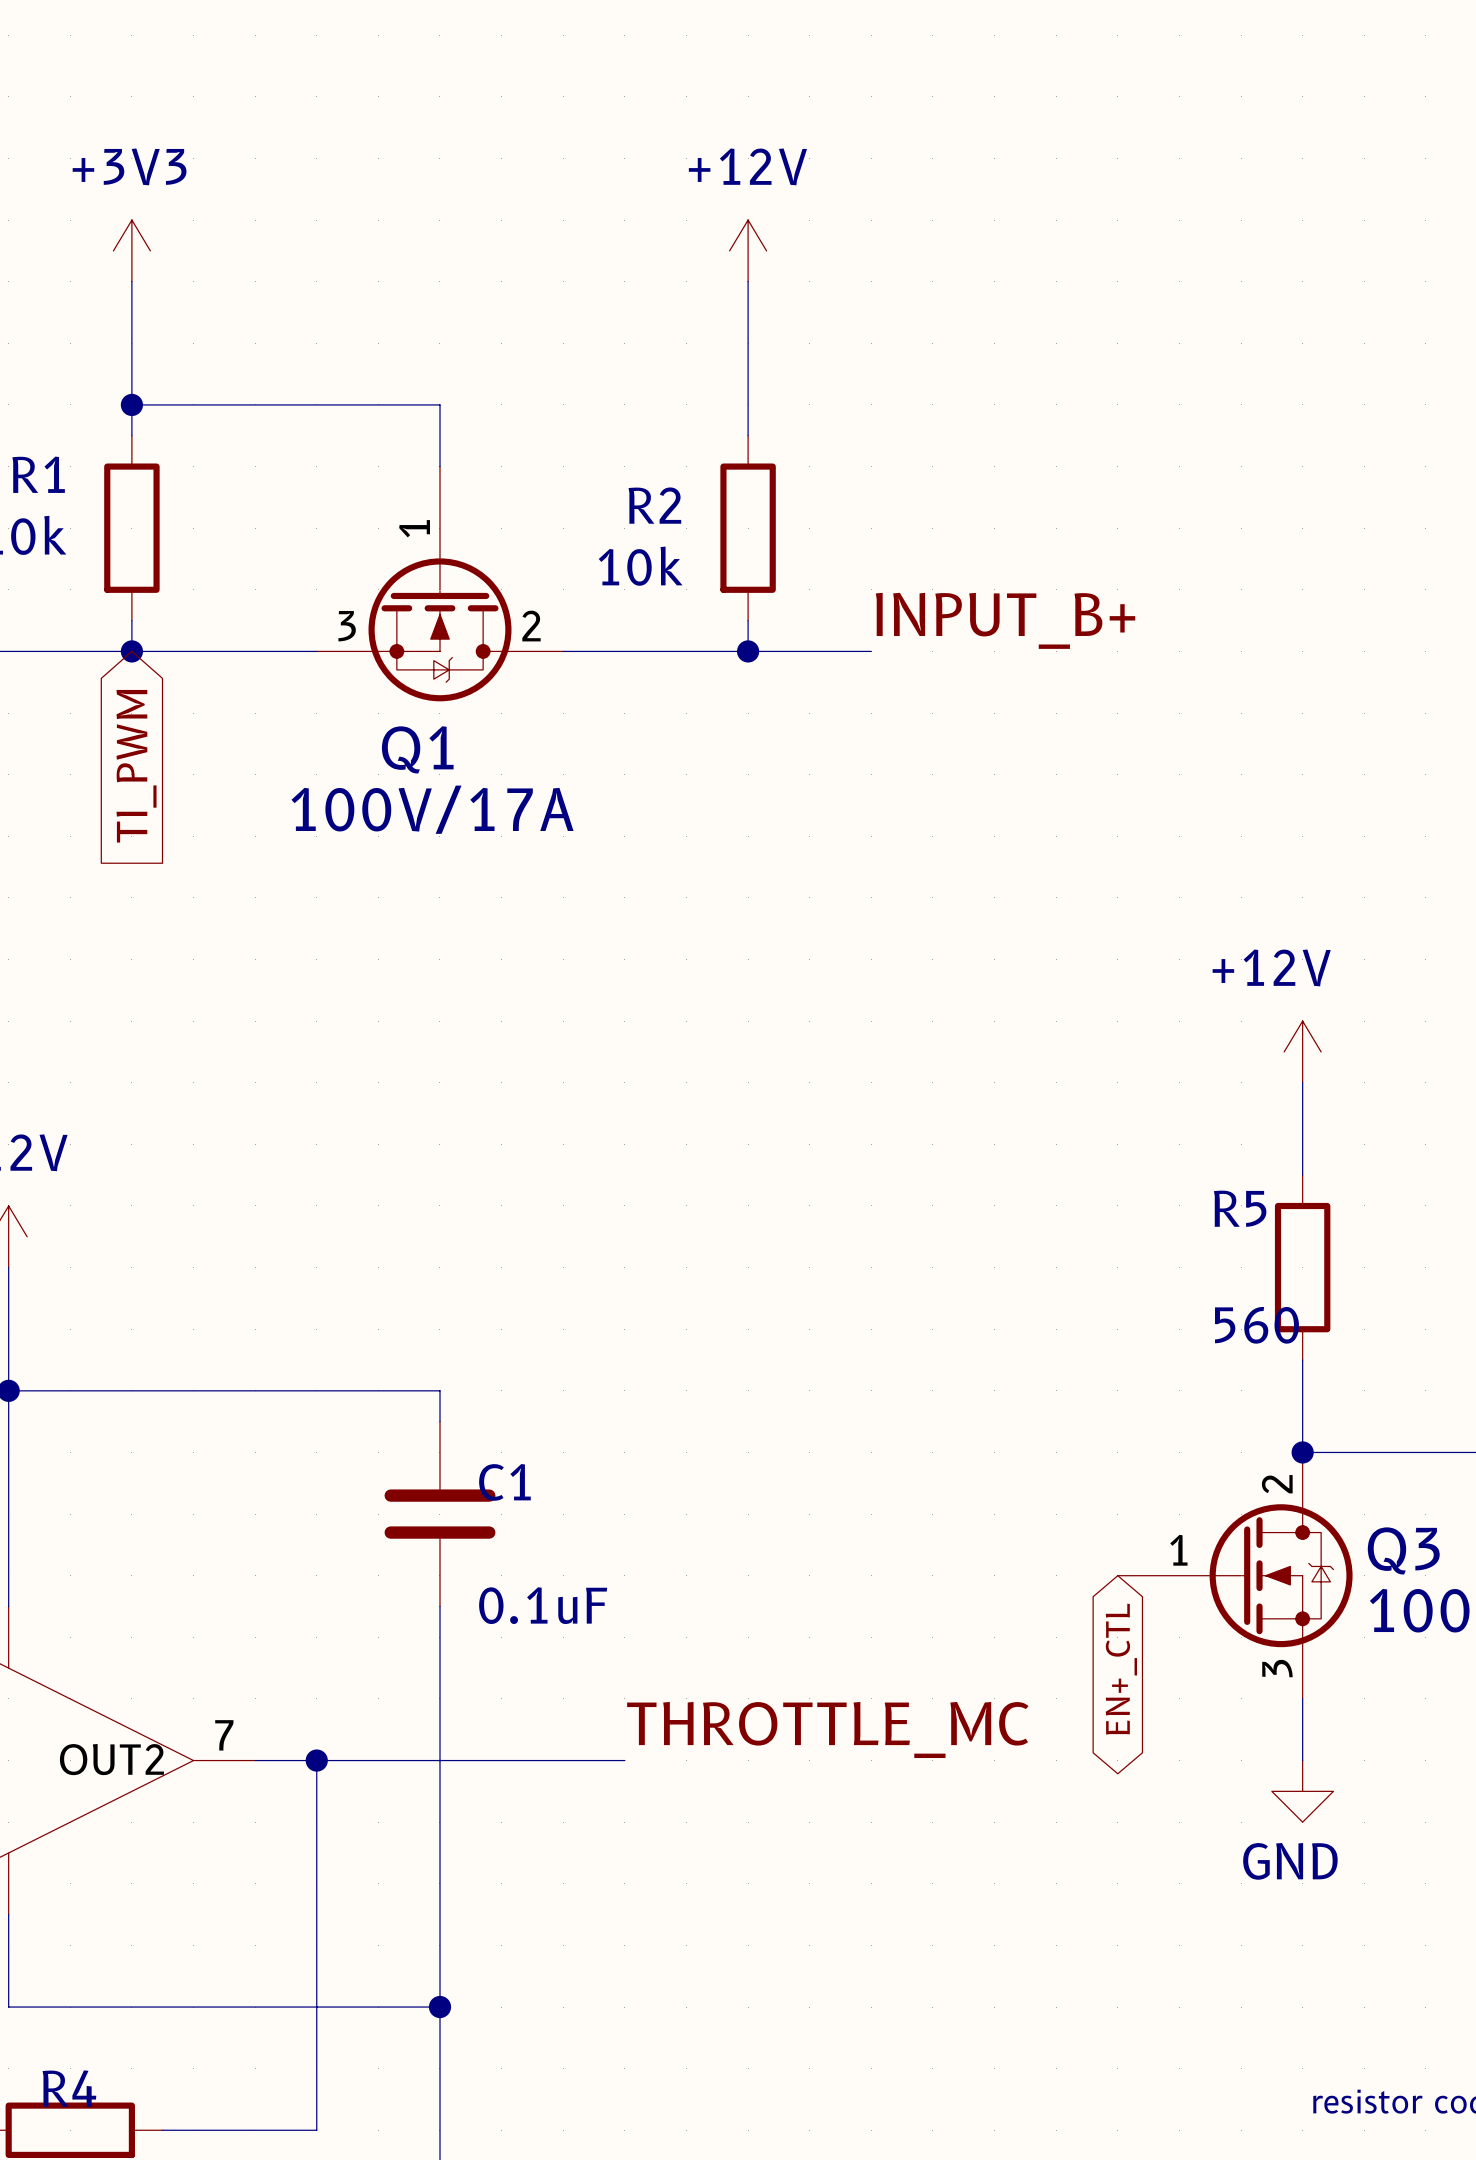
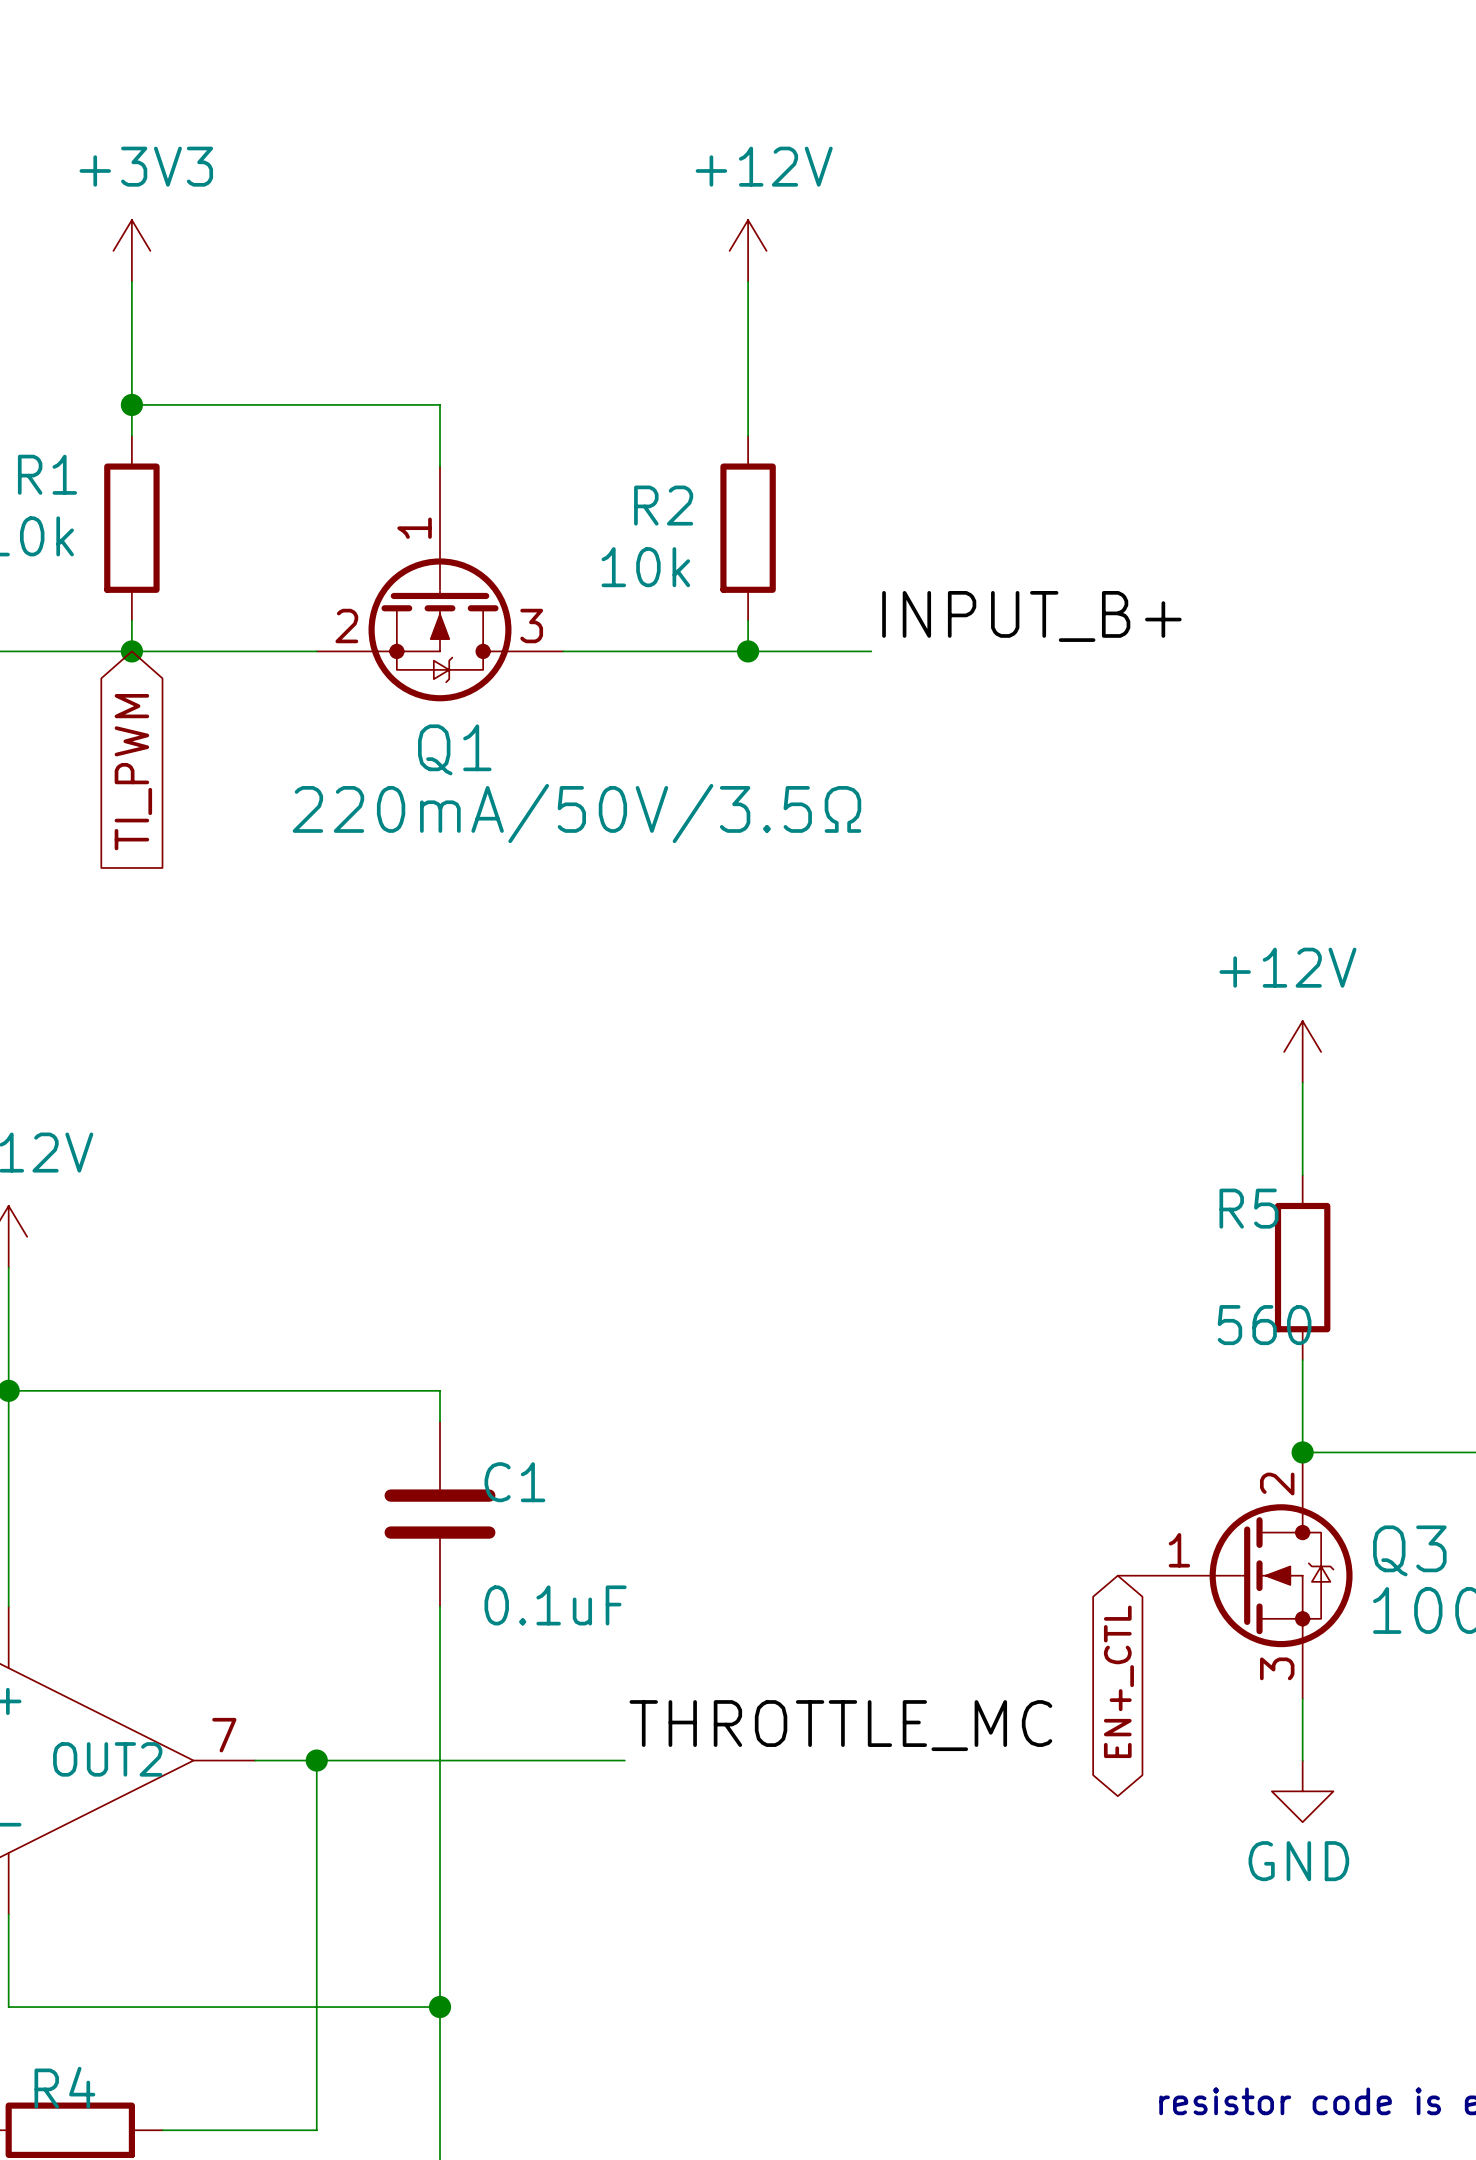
Q1 pin number: 3 (347, 626) -> 2 (346, 626)
Q1 pin number: 2 (531, 626) -> 3 (531, 626)
Q1 name position: Q1 (417, 749) -> Q1 (454, 749)
Q1 value: 100V/17A (432, 809) -> 220mA/50V/3.5Ω (576, 813)

